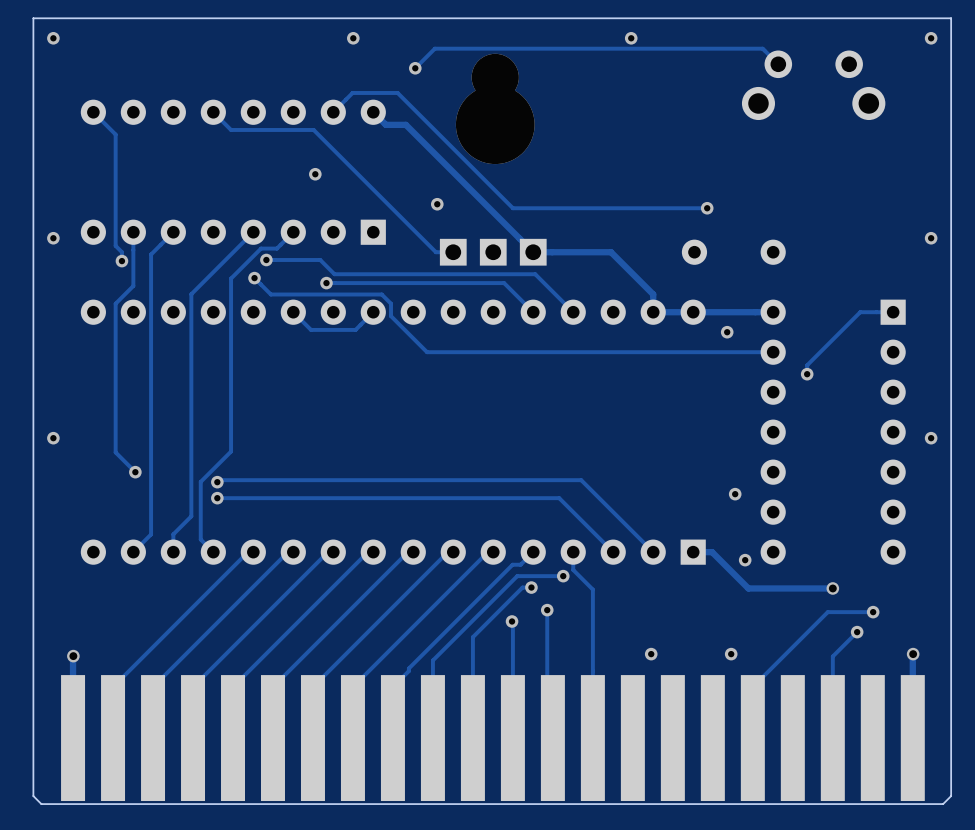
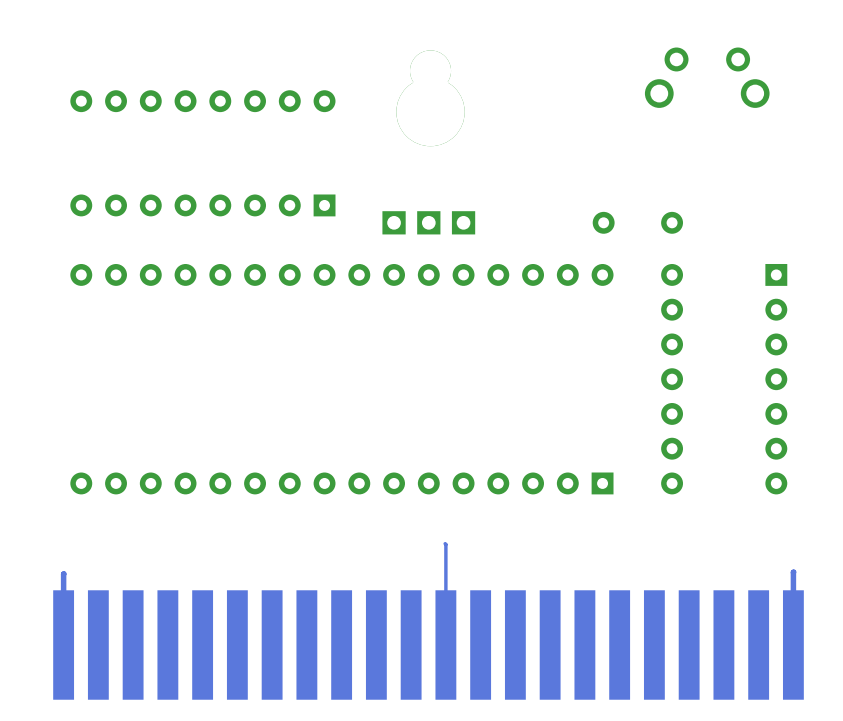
board edge: (951, 18) (33, 18) (33, 796) (41, 804) (943, 804) (951, 796) (951, 18) -> none
via: (53, 38) -> none
via: (353, 38) -> none
via: (631, 38) -> none
via: (931, 38) -> none
track: (778, 64) (762, 48) (434, 48) (415, 68) -> none
via: (415, 68) -> none
track: (93, 112) (115, 134) (115, 245) (121, 252) (121, 261) -> none
track: (213, 112) (231, 129) (313, 129) (435, 252) (453, 252) -> none
track: (333, 112) (352, 92) (397, 92) (512, 208) (707, 208) -> none
track: (373, 112) (385, 124) (405, 124) (533, 252) (611, 252) (653, 294) (653, 312) (773, 312) -> none
via: (315, 174) -> none
via: (437, 204) -> none
via: (707, 208) -> none
track: (133, 232) (133, 286) (115, 303) (115, 452) (135, 472) -> none
track: (173, 232) (151, 254) (151, 534) (133, 552) -> none
track: (253, 232) (191, 294) (191, 516) (173, 534) (173, 552) -> none
track: (293, 232) (276, 248) (261, 248) (231, 278) (231, 451) (200, 481) (200, 539) (213, 552) -> none
via: (53, 238) -> none
via: (931, 238) -> none
track: (266, 259) (320, 259) (334, 274) (535, 274) (573, 312) -> none
via: (266, 259) -> none
via: (121, 261) -> none
track: (254, 278) (270, 294) (381, 294) (391, 303) (391, 316) (427, 352) (773, 352) -> none
via: (254, 278) -> none
track: (326, 283) (504, 283) (533, 312) -> none
via: (326, 283) -> none
track: (373, 312) (355, 329) (311, 329) (293, 312) -> none
track: (893, 312) (860, 312) (807, 365) (807, 374) -> none
via: (727, 332) -> none
via: (807, 374) -> none
via: (53, 438) -> none
via: (931, 438) -> none
via: (135, 472) -> none
track: (217, 482) (219, 480) (581, 480) (653, 552) -> none
via: (217, 482) -> none
via: (735, 494) -> none
track: (217, 498) (559, 498) (613, 552) -> none
via: (217, 498) -> none
track: (253, 552) (247, 552) (113, 687) (113, 738) -> none
track: (293, 552) (287, 552) (153, 687) (153, 738) -> none
track: (333, 552) (327, 552) (193, 687) (193, 738) -> none
track: (373, 552) (367, 552) (233, 687) (233, 738) -> none
track: (413, 552) (407, 552) (272, 687) (272, 738) -> none
track: (453, 552) (447, 552) (312, 687) (312, 738) -> none
track: (493, 552) (487, 552) (352, 687) (352, 738) -> none
track: (533, 552) (520, 564) (512, 564) (408, 668) (408, 671) (392, 687) (392, 738) -> none
track: (573, 552) (573, 569) (592, 589) (592, 738) -> none
track: (693, 552) (712, 552) (748, 588) (832, 588) -> none
via: (745, 560) -> none
track: (563, 576) (517, 576) (432, 660) (432, 738) -> none
via: (563, 576) -> none
track: (531, 587) (522, 587) (472, 637) (472, 738) -> none
via: (531, 587) -> none
via: (832, 588) -> none
track: (547, 610) (547, 732) (552, 738) -> none
via: (547, 610) -> none
track: (873, 612) (827, 612) (752, 687) (752, 738) -> none
via: (873, 612) -> none
via: (512, 621) -> none
track: (857, 632) (832, 656) (832, 738) -> none
via: (857, 632) -> none
via: (651, 654) -> none
via: (731, 654) -> none
via: (913, 654) -> none
via: (73, 656) -> none

